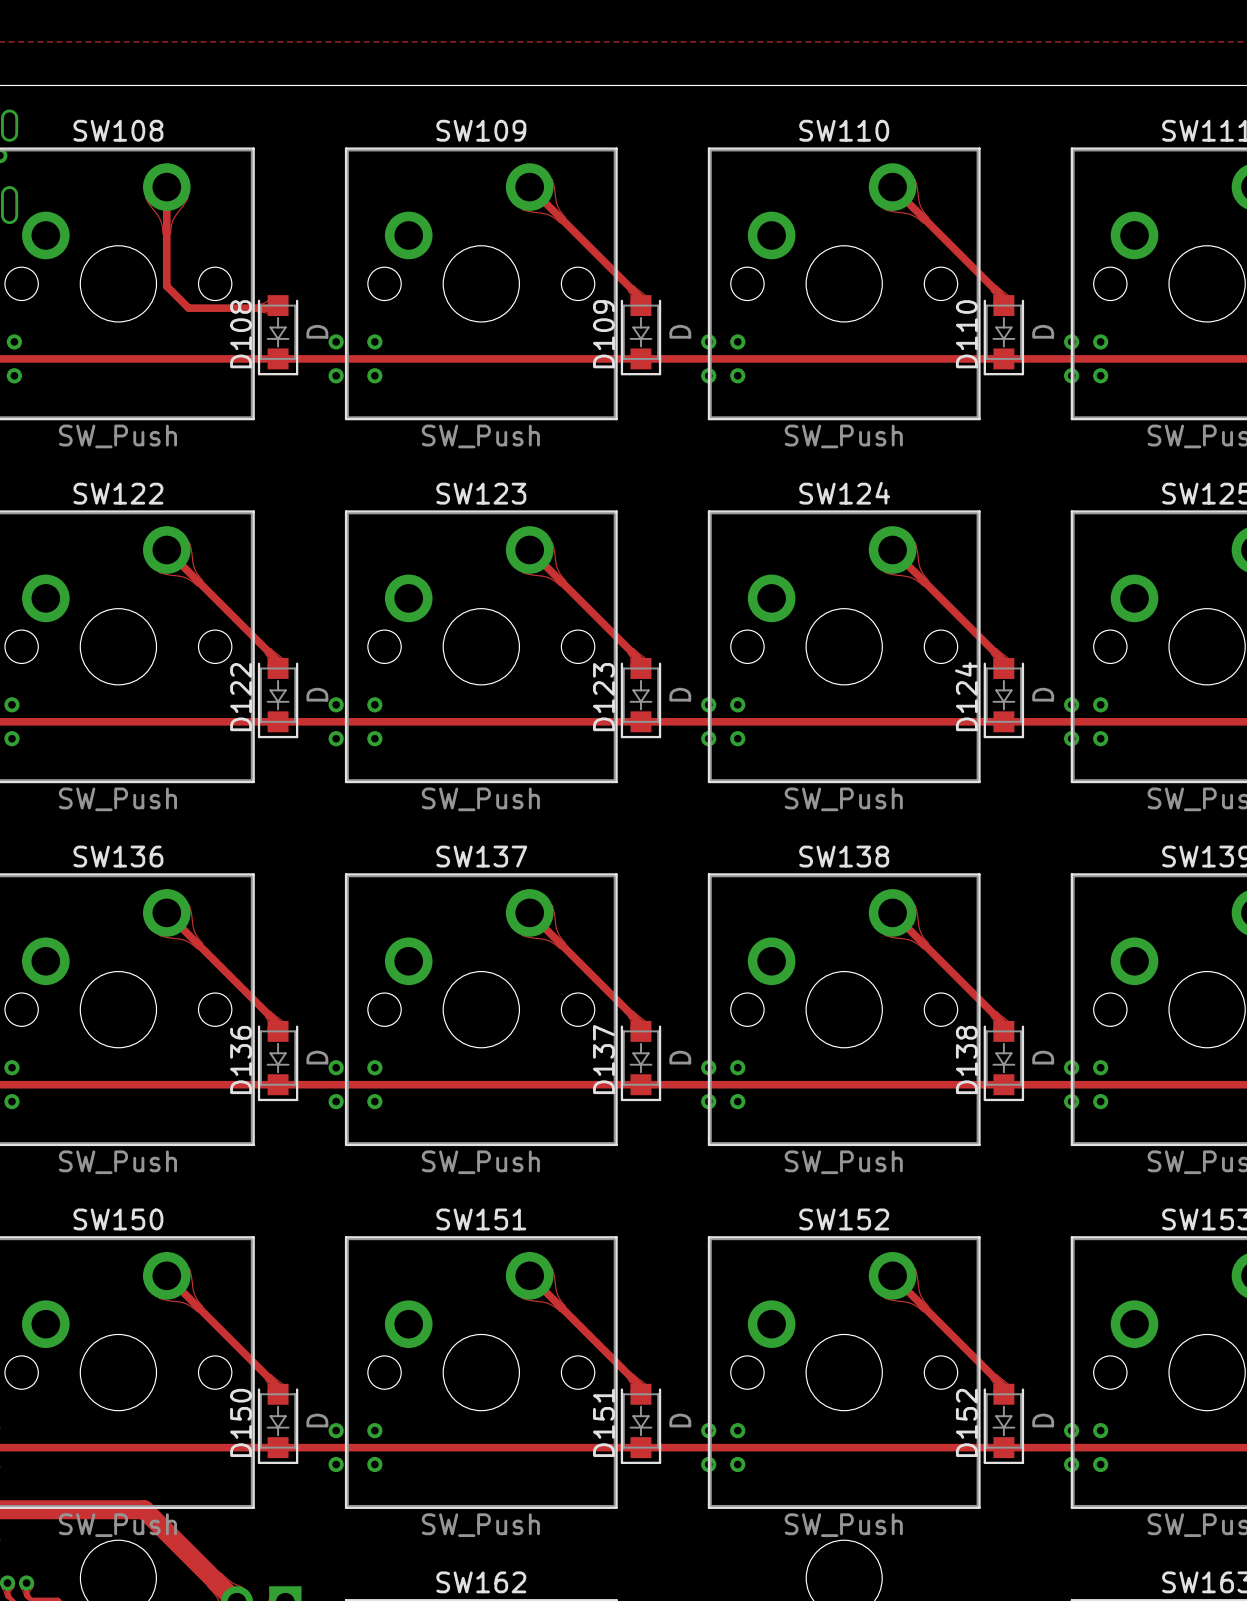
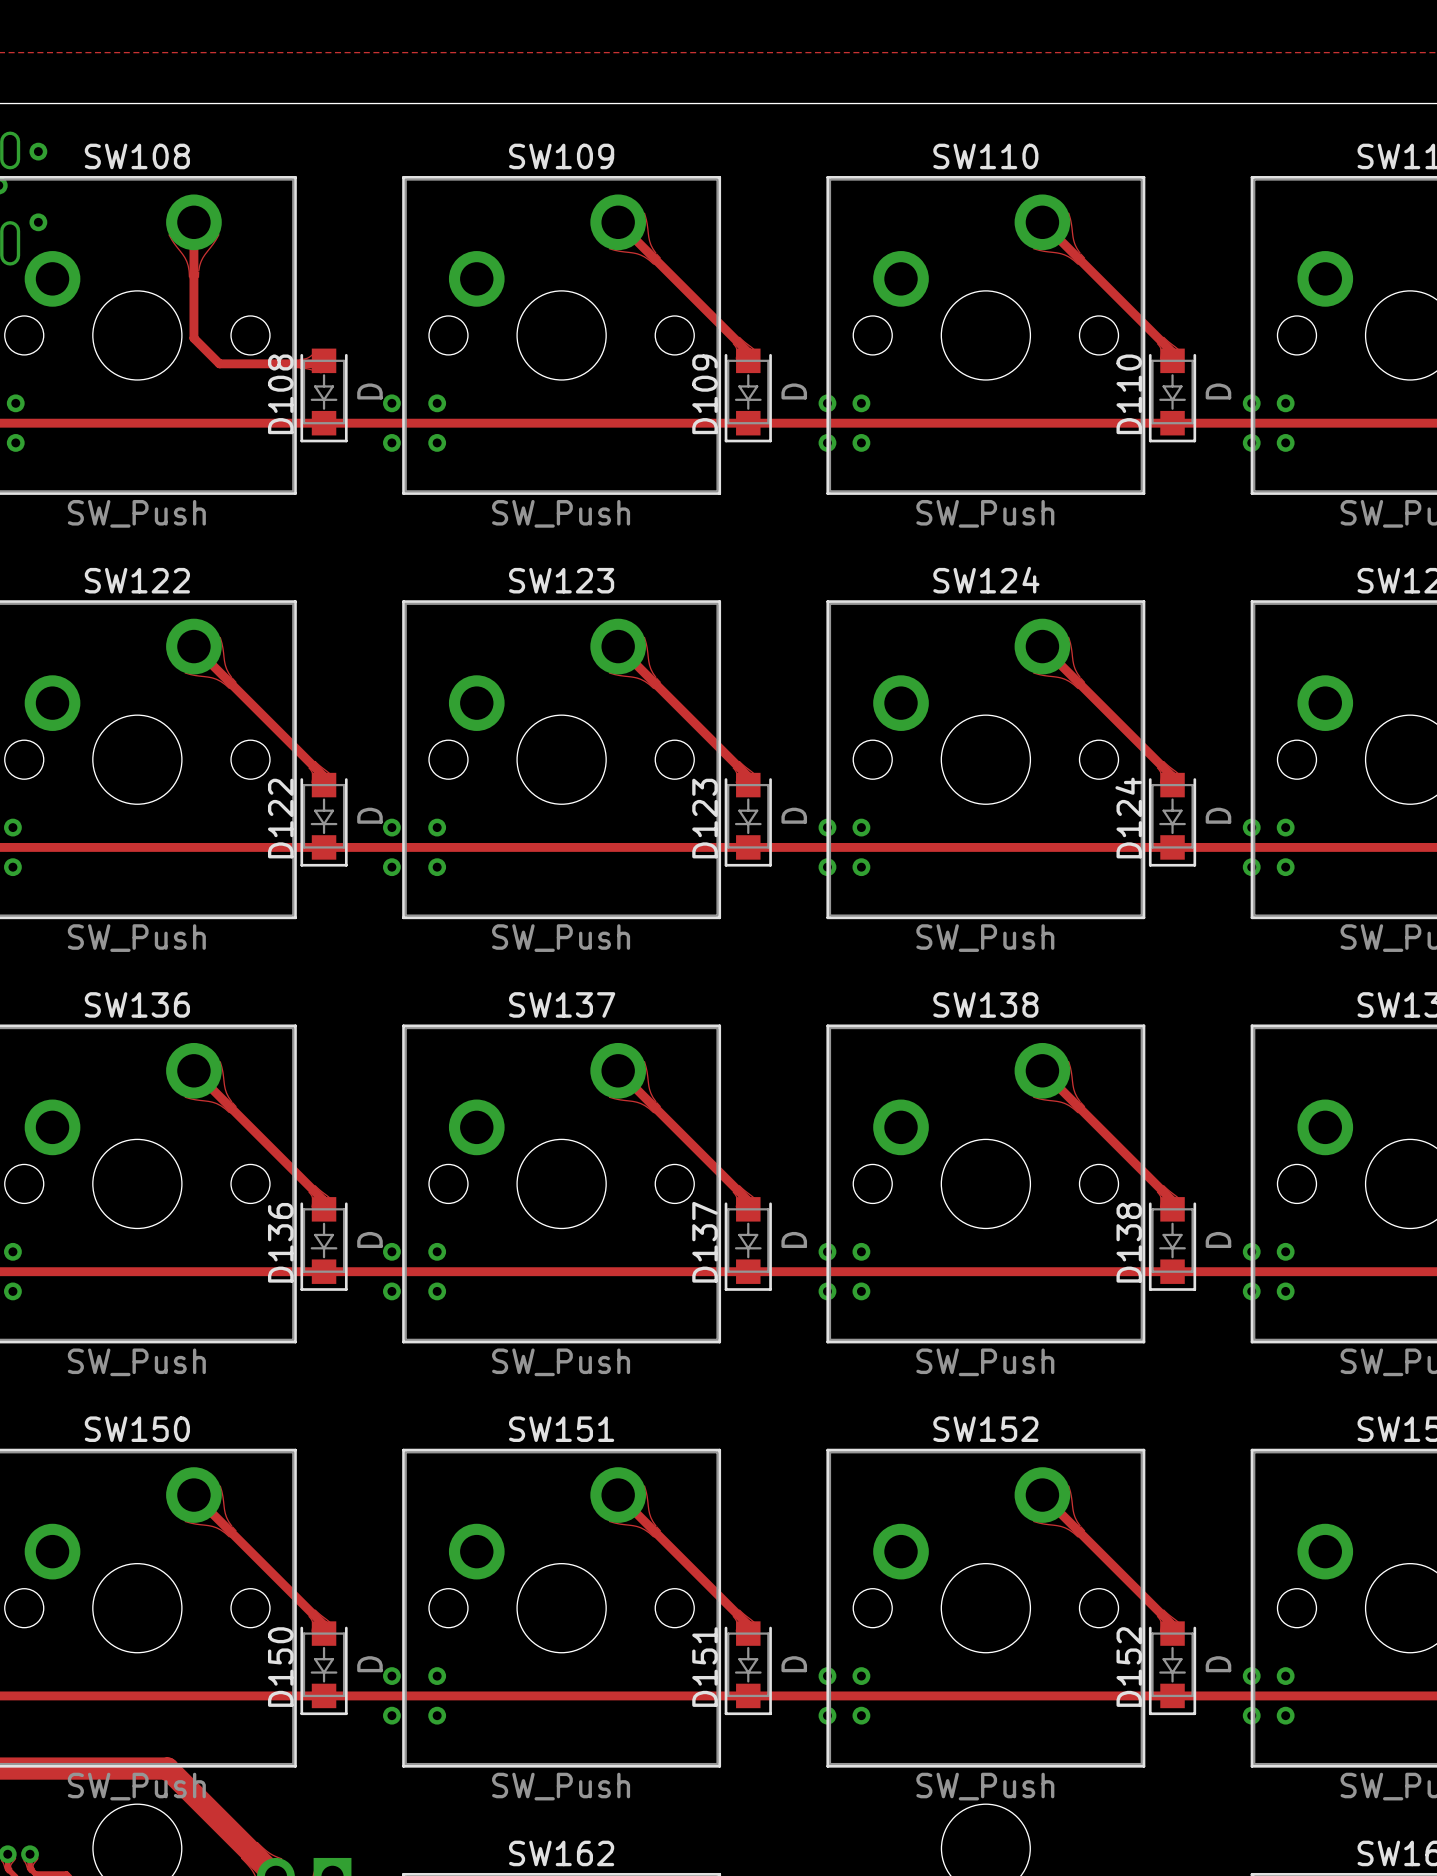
via: none -> (38, 151)
via: none -> (38, 222)

